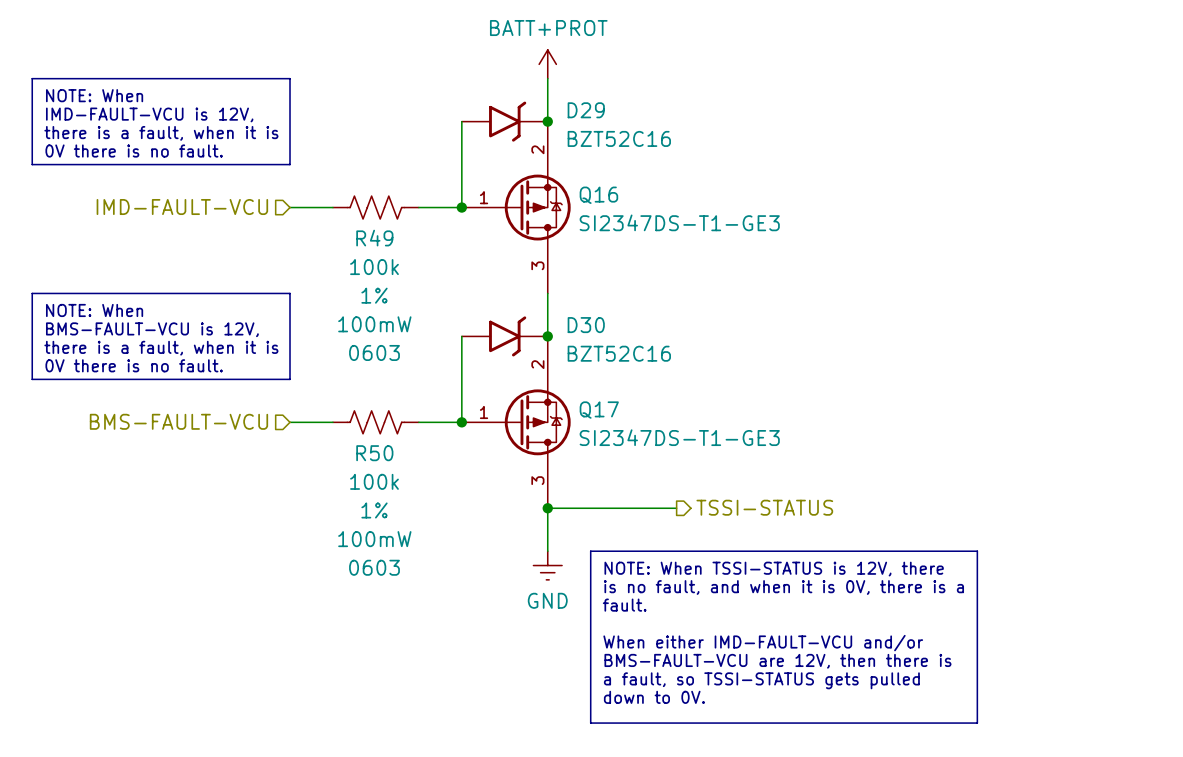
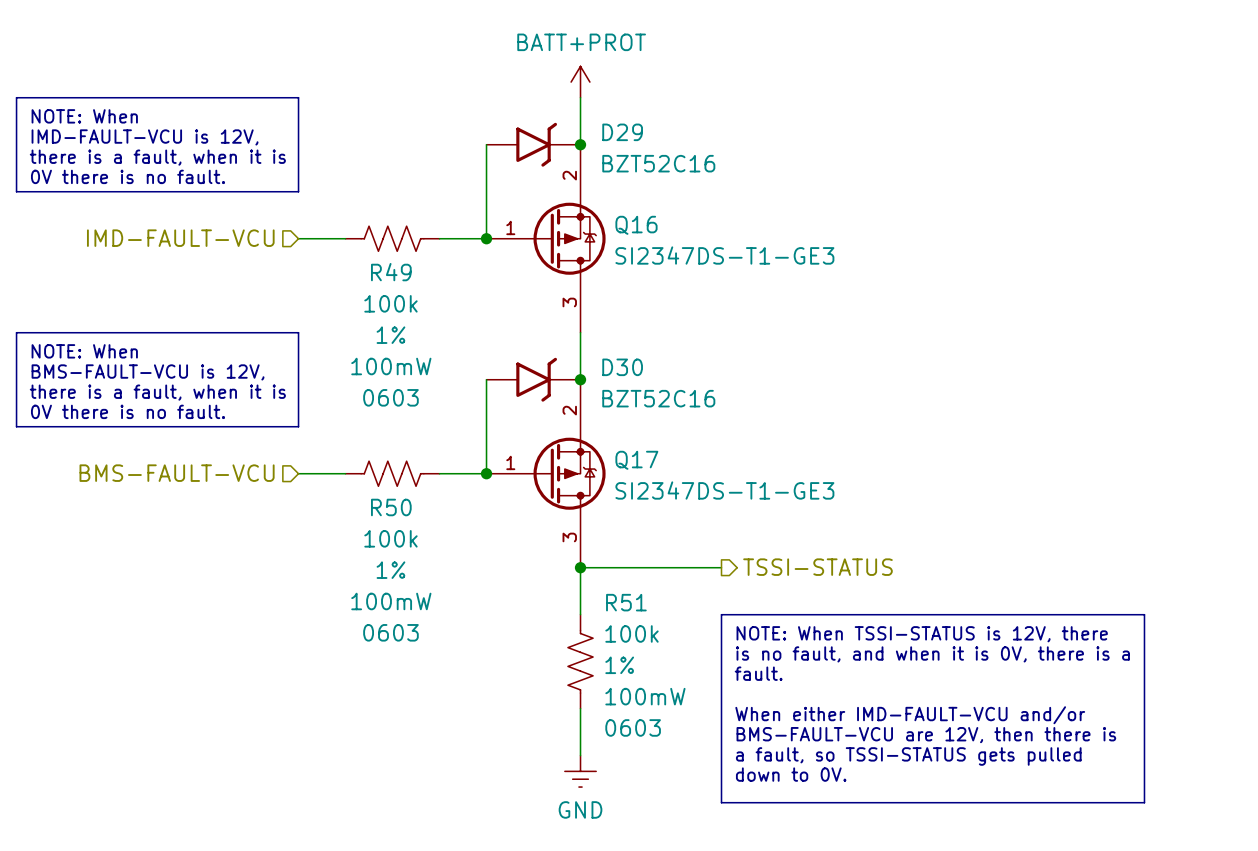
line: (676, 551) (590, 551) (590, 723) (676, 723) -> (721, 614) (721, 802)
line: (977, 551) (977, 723) -> (1050, 614) (1144, 614) (1144, 802) (1050, 802)
power symbol position: GND (547, 565) -> GND (580, 771)
text position: NOTE: When TSSI-STATUS is 12V, there (774, 569) -> NOTE: When TSSI-STATUS is 12V, there (922, 634)
text position: is no fault, and when it is 0V, there is a (783, 587) -> is no fault, and when it is 0V, there is a (932, 654)
R51: none -> 100k (580, 661)
text position: fault. (624, 605) -> fault. (758, 673)
wire: none -> (580, 708) (580, 755)
text position: When either IMD-FAULT-VCU and/or (763, 643) -> When either IMD-FAULT-VCU and/or (910, 715)
text position: BMS-FAULT-VCU are 12V, then there is (777, 661) -> BMS-FAULT-VCU are 12V, then there is (926, 735)
text position: a fault, so TSSI-STATUS gets pulled (761, 680) -> a fault, so TSSI-STATUS gets pulled (908, 756)
text position: down to 0V. (654, 697) -> down to 0V. (791, 774)

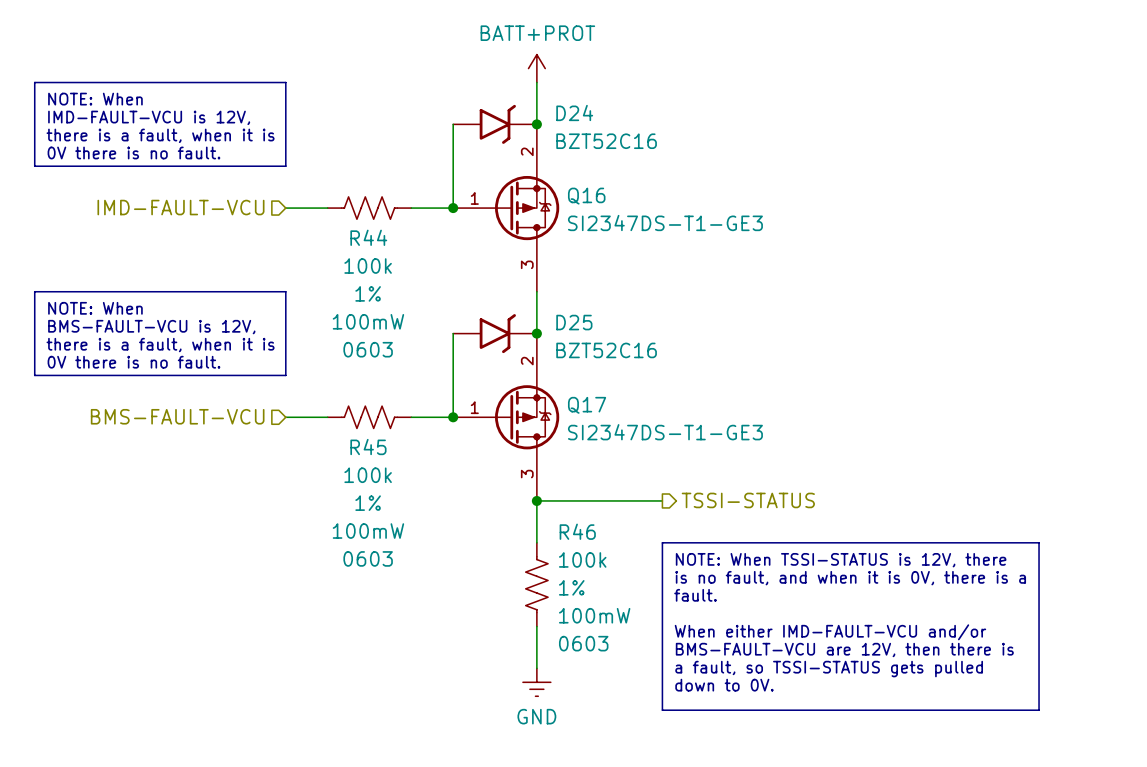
D29 name: D29 (622, 132) -> D24 (574, 112)
R49 name: R49 (391, 272) -> R44 (368, 237)
D30 name: D30 (622, 367) -> D25 (574, 322)
R50 name: R50 (391, 507) -> R45 (368, 447)
R51 name: R51 (626, 602) -> R46 (577, 531)

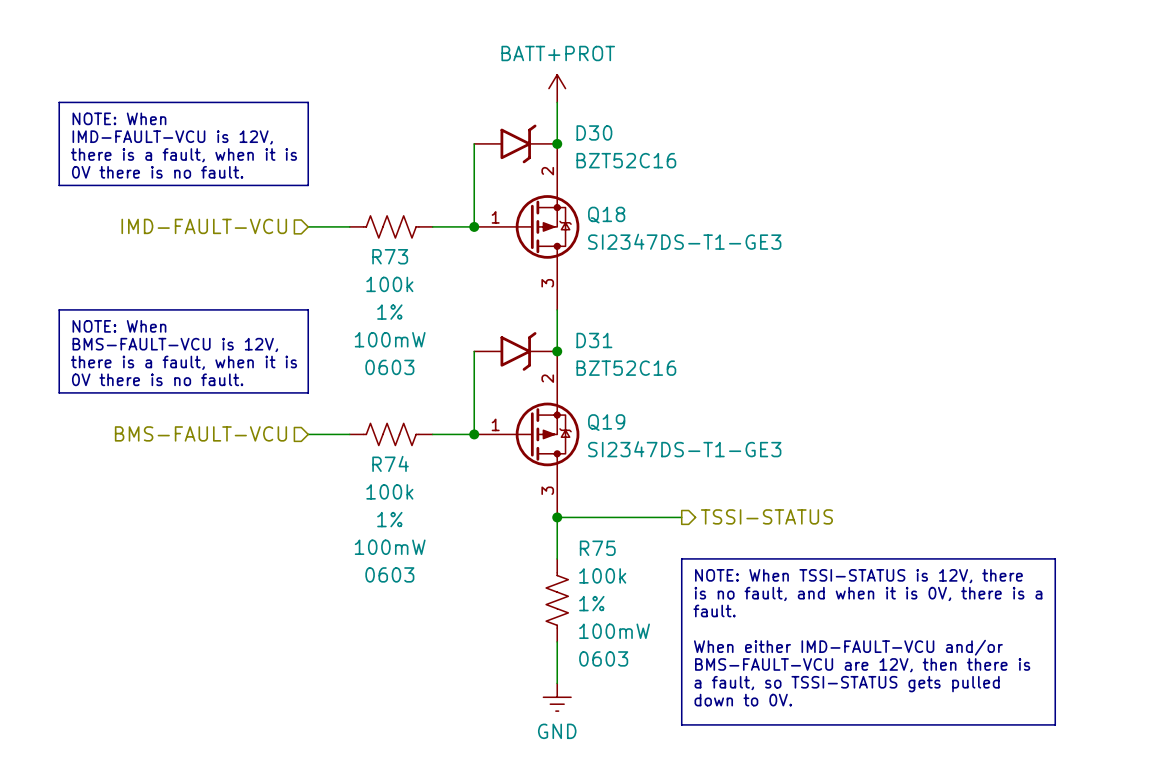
D24 name: D24 (574, 112) -> D30 (594, 132)
Q16 name: Q16 (586, 196) -> Q18 (606, 215)
R44 name: R44 (368, 237) -> R73 (390, 256)
D25 name: D25 (574, 322) -> D31 (594, 340)
Q17 name: Q17 (587, 405) -> Q19 (606, 422)
R45 name: R45 (368, 447) -> R74 (390, 463)
R46 name: R46 (577, 531) -> R75 (597, 548)

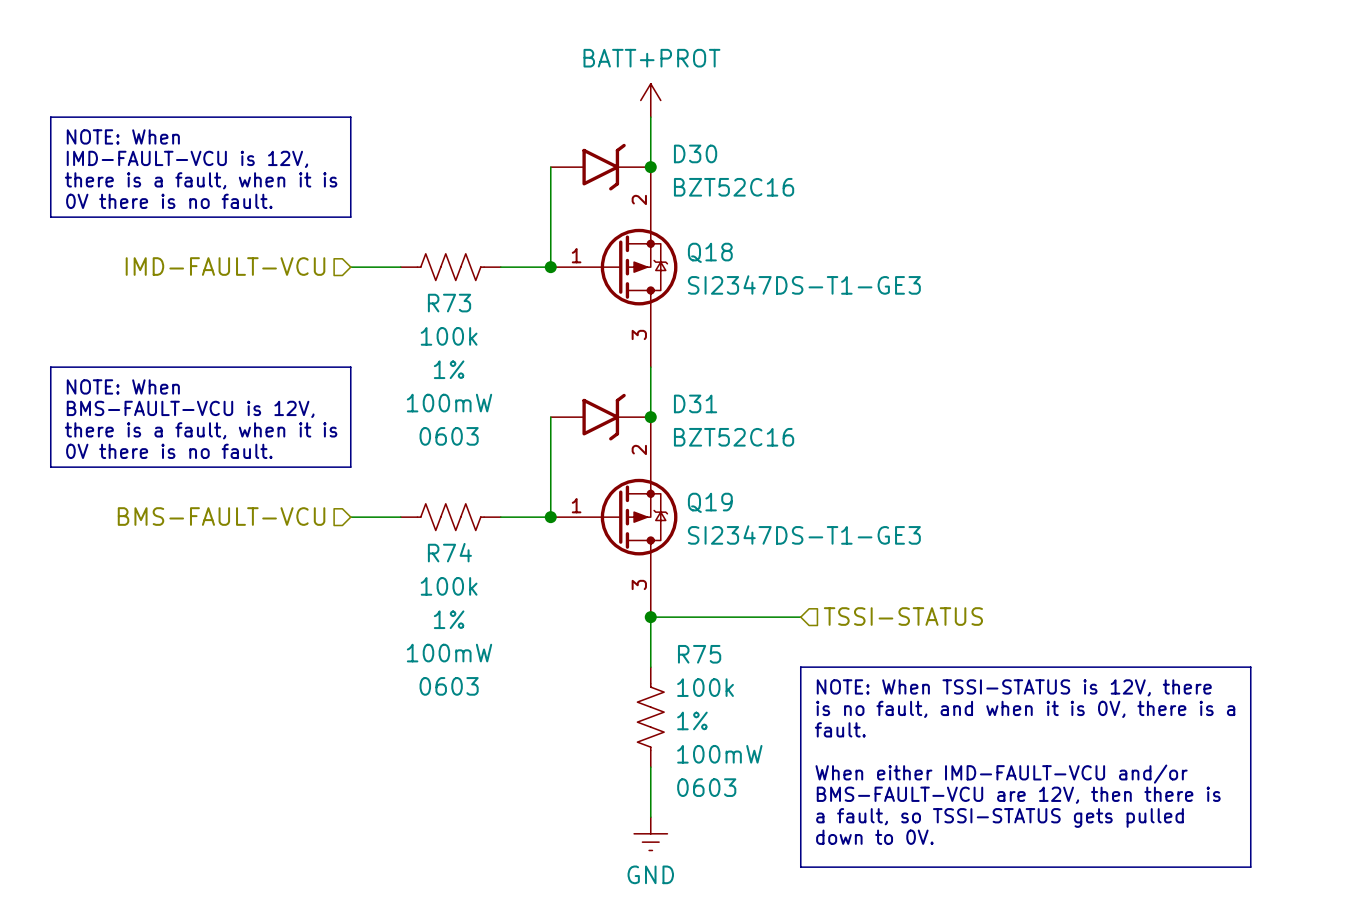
hierarchical label shape: output (766, 516) -> input (903, 616)

